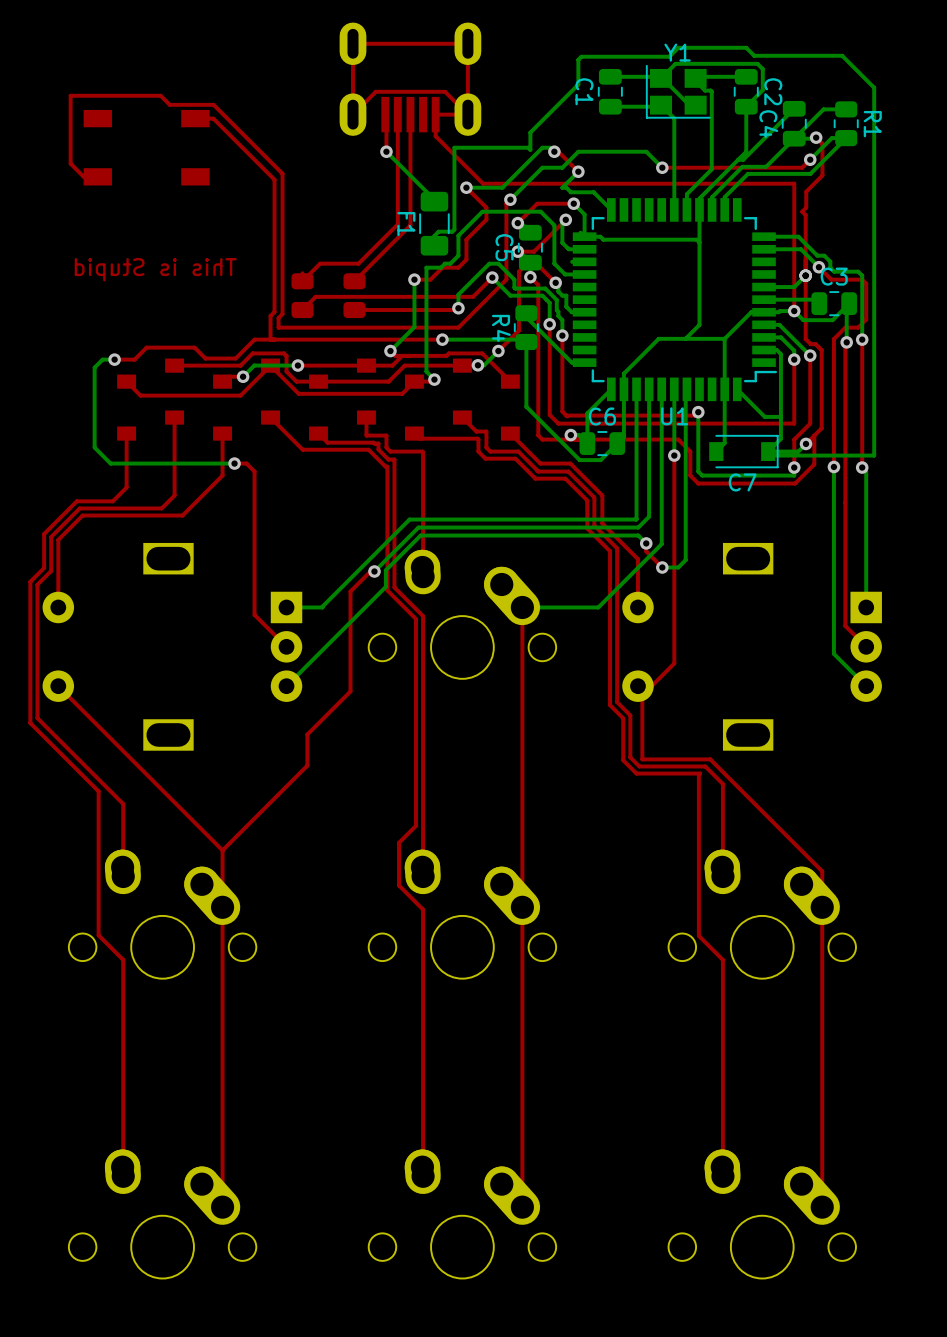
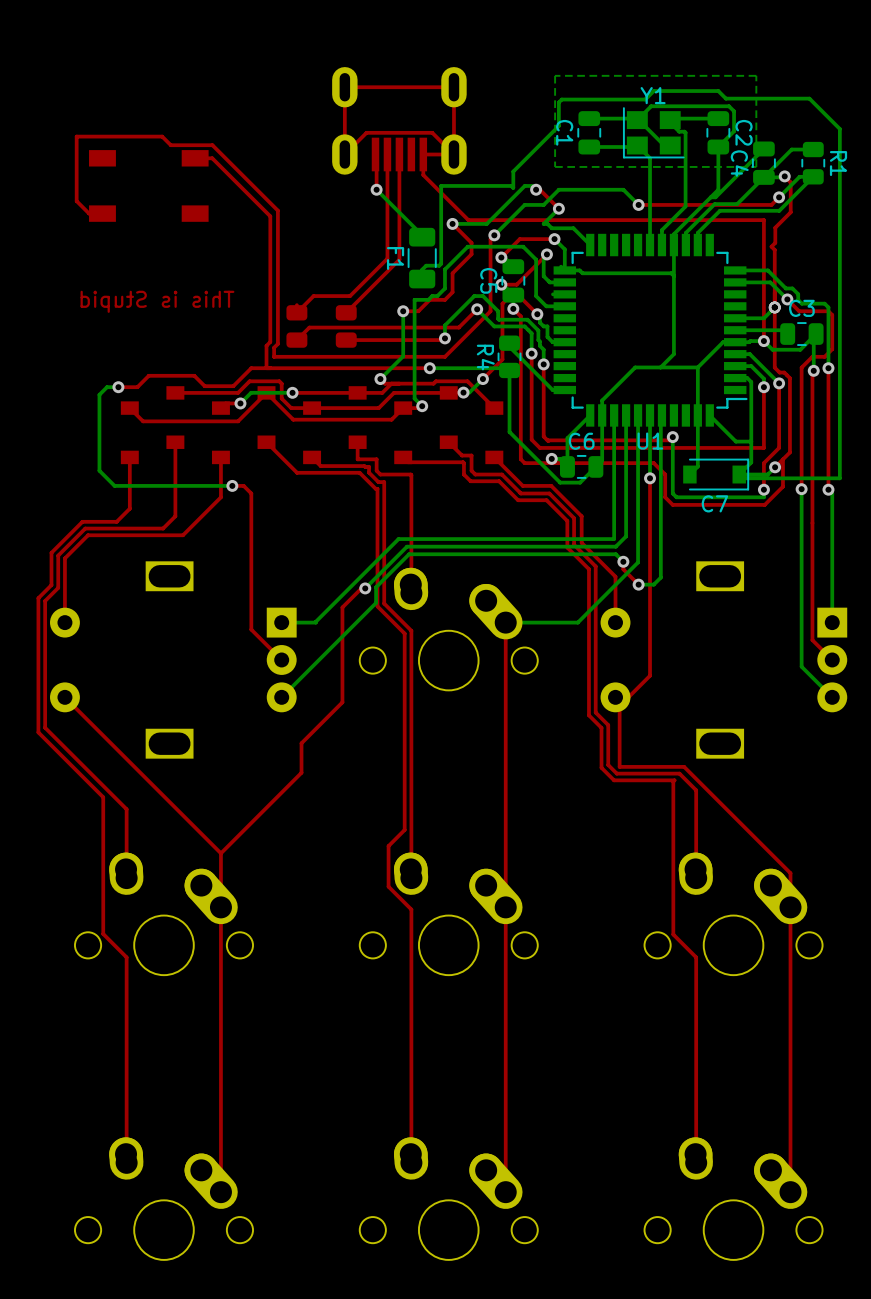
bottom zone outline: none -> (756, 75) (756, 166) (555, 166) (555, 75) (756, 75)

